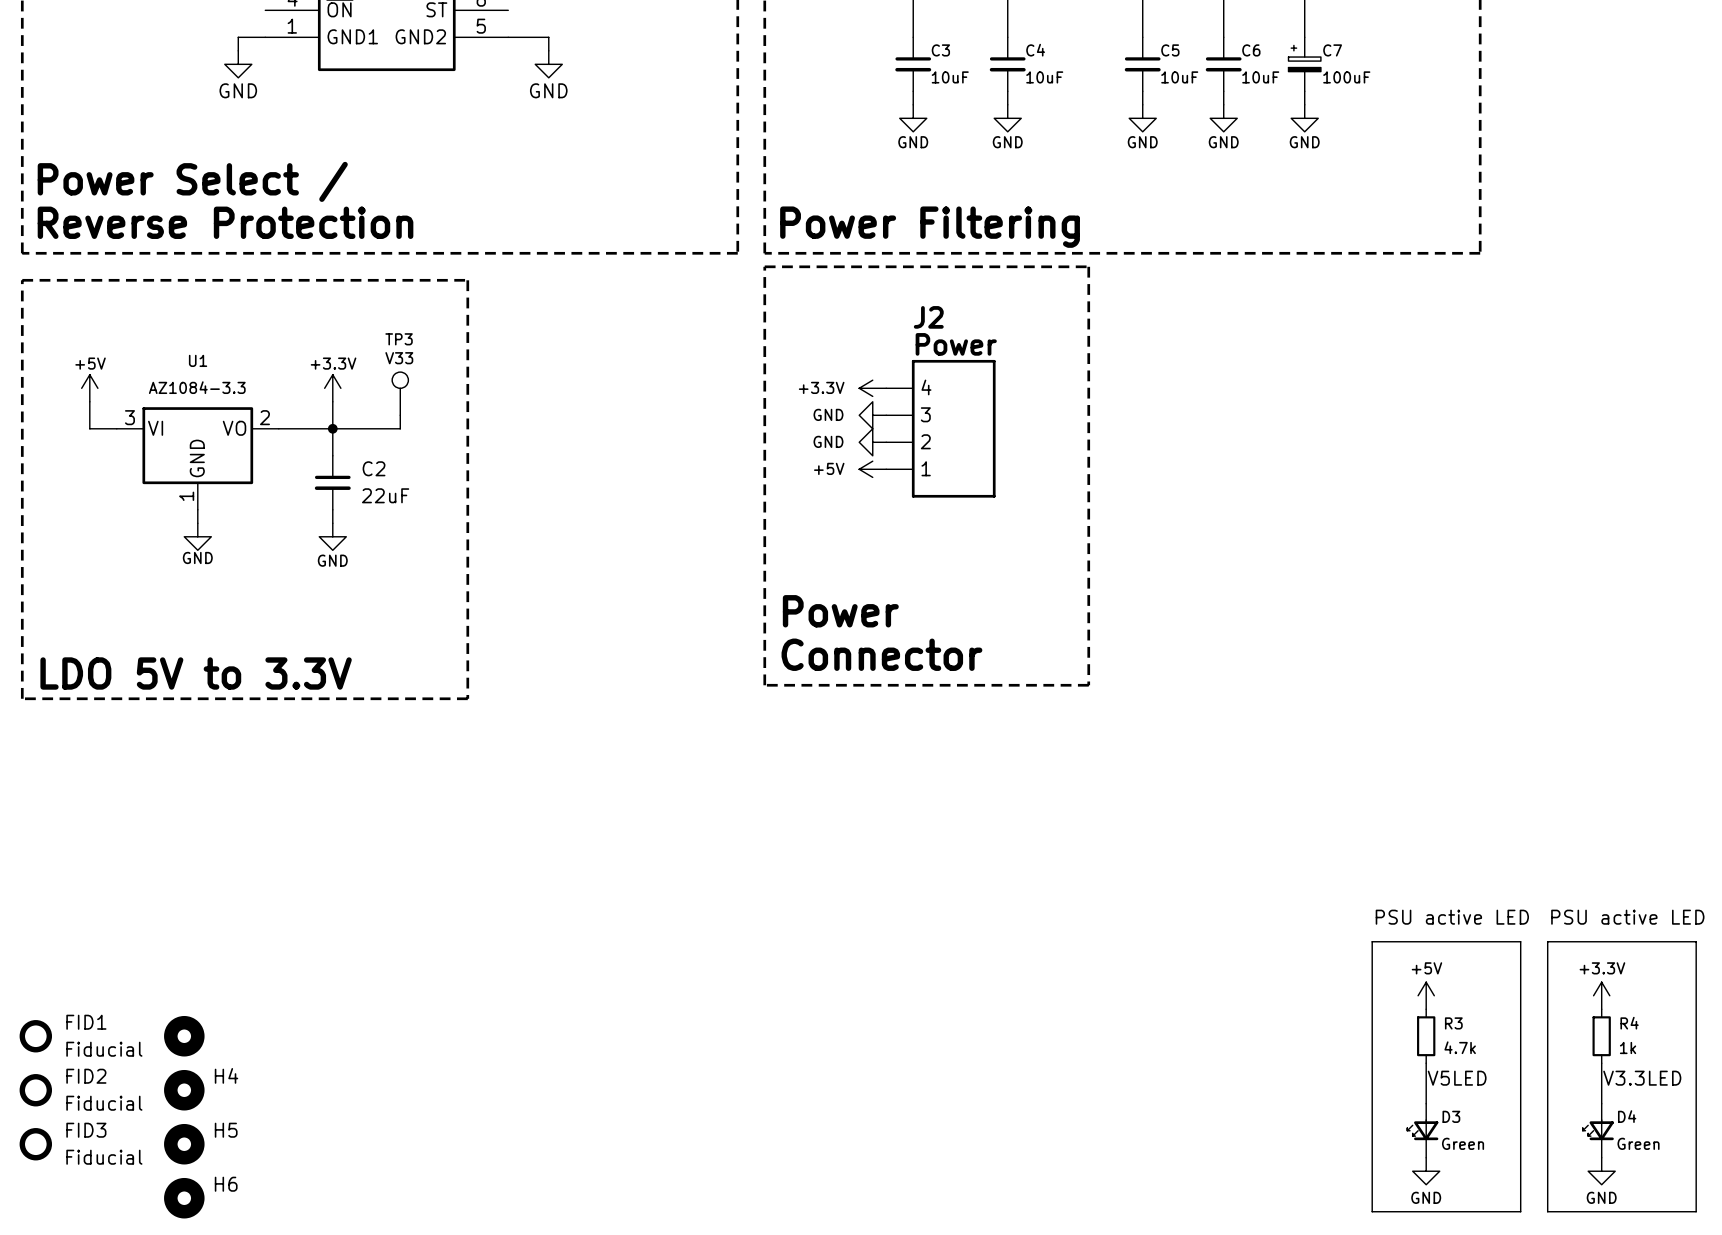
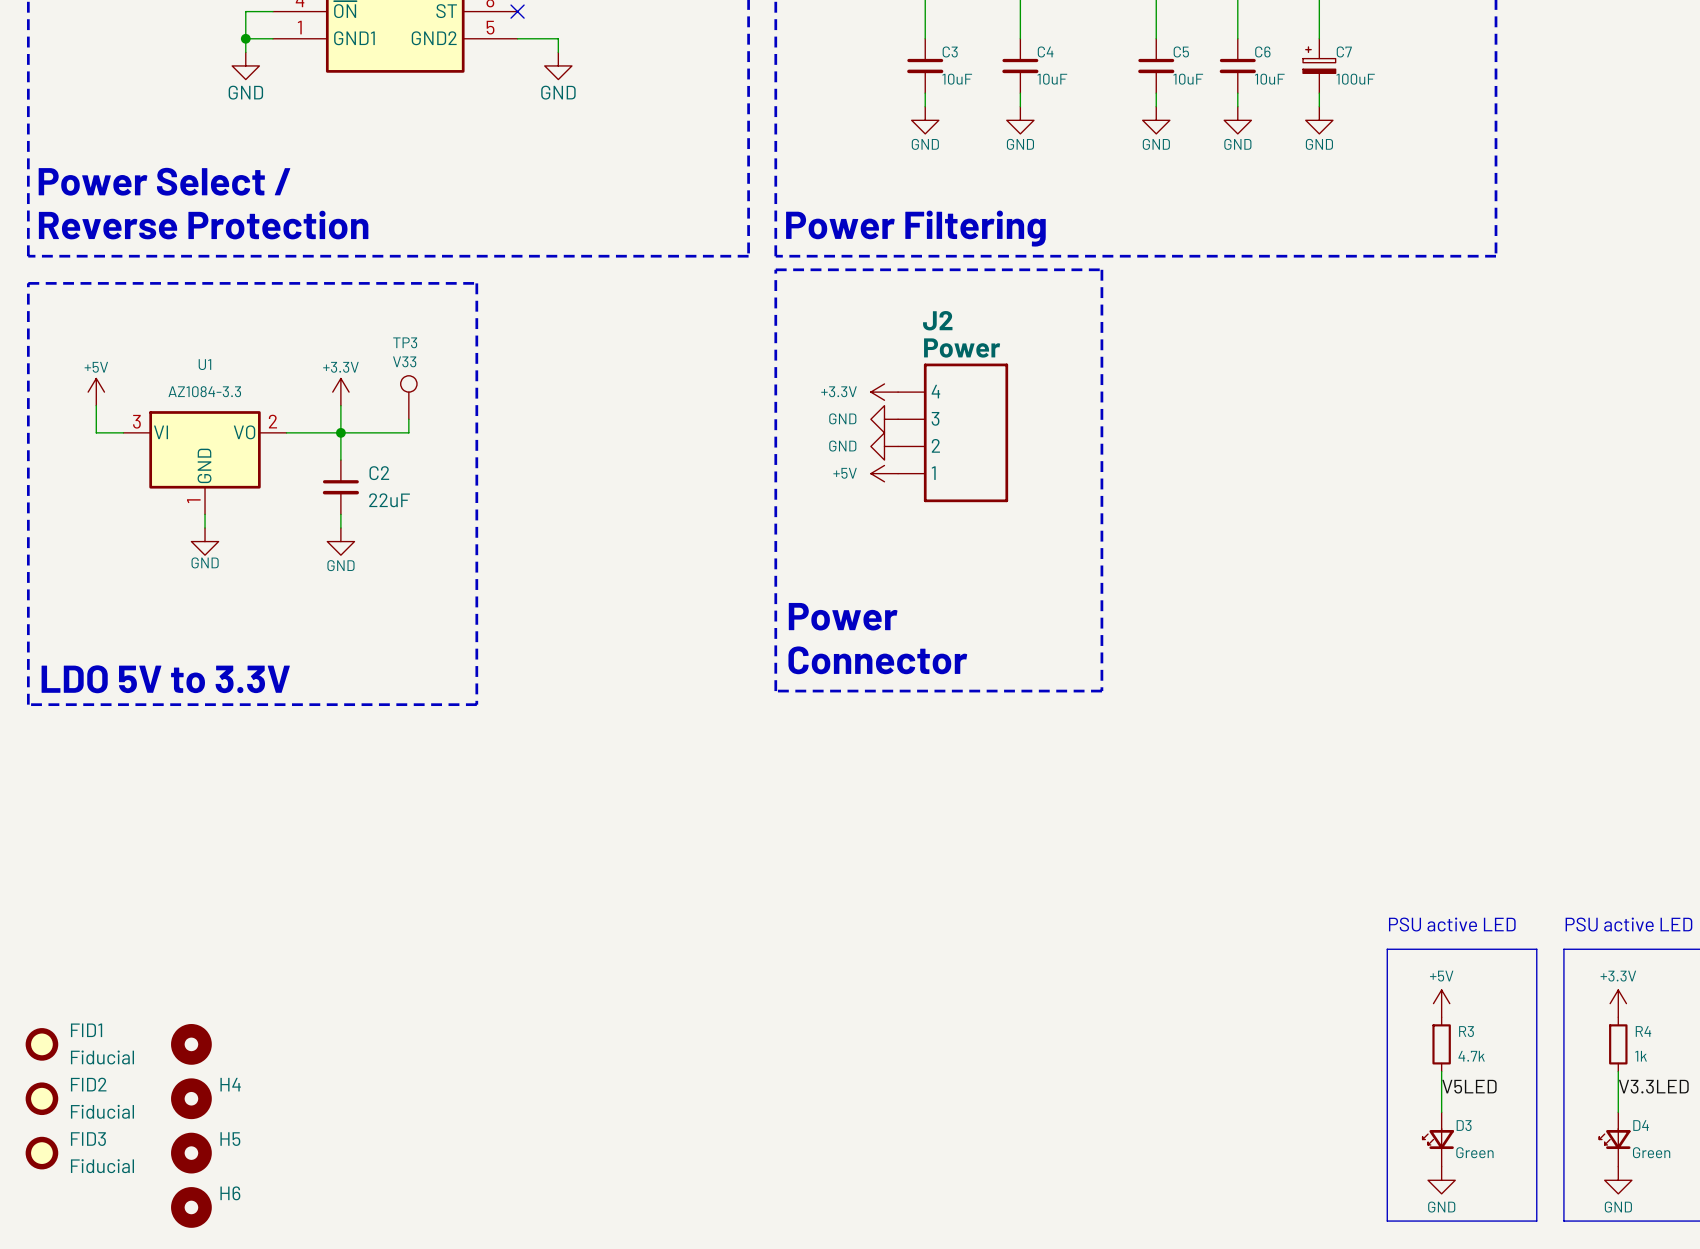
wire: none -> (272, 11) (245, 11) (245, 38)
no-connect mark: none -> (517, 11)
junction: none -> (245, 38)

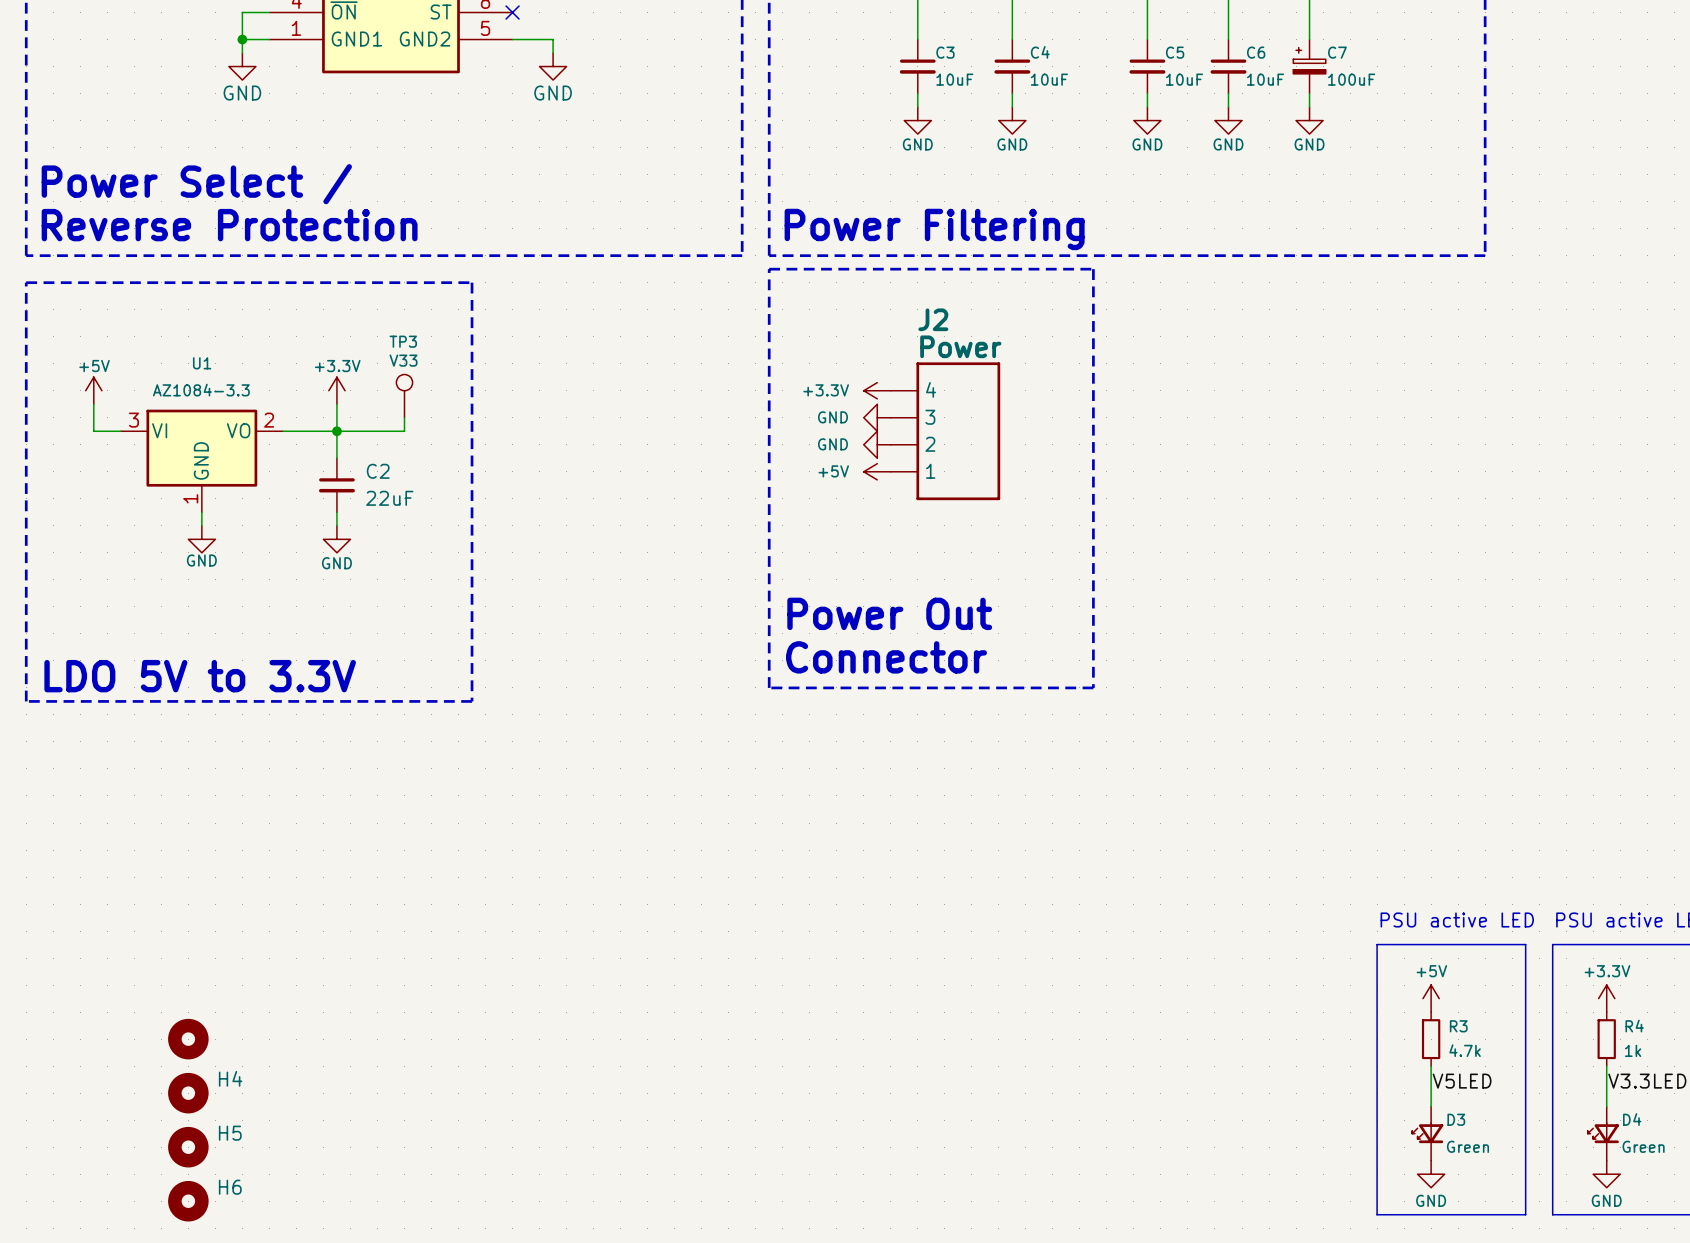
text: Power (843, 616) -> Power Out (889, 613)
FID1: Fiducial (41, 1044) -> none
FID2: Fiducial (41, 1098) -> none
FID3: Fiducial (41, 1153) -> none

